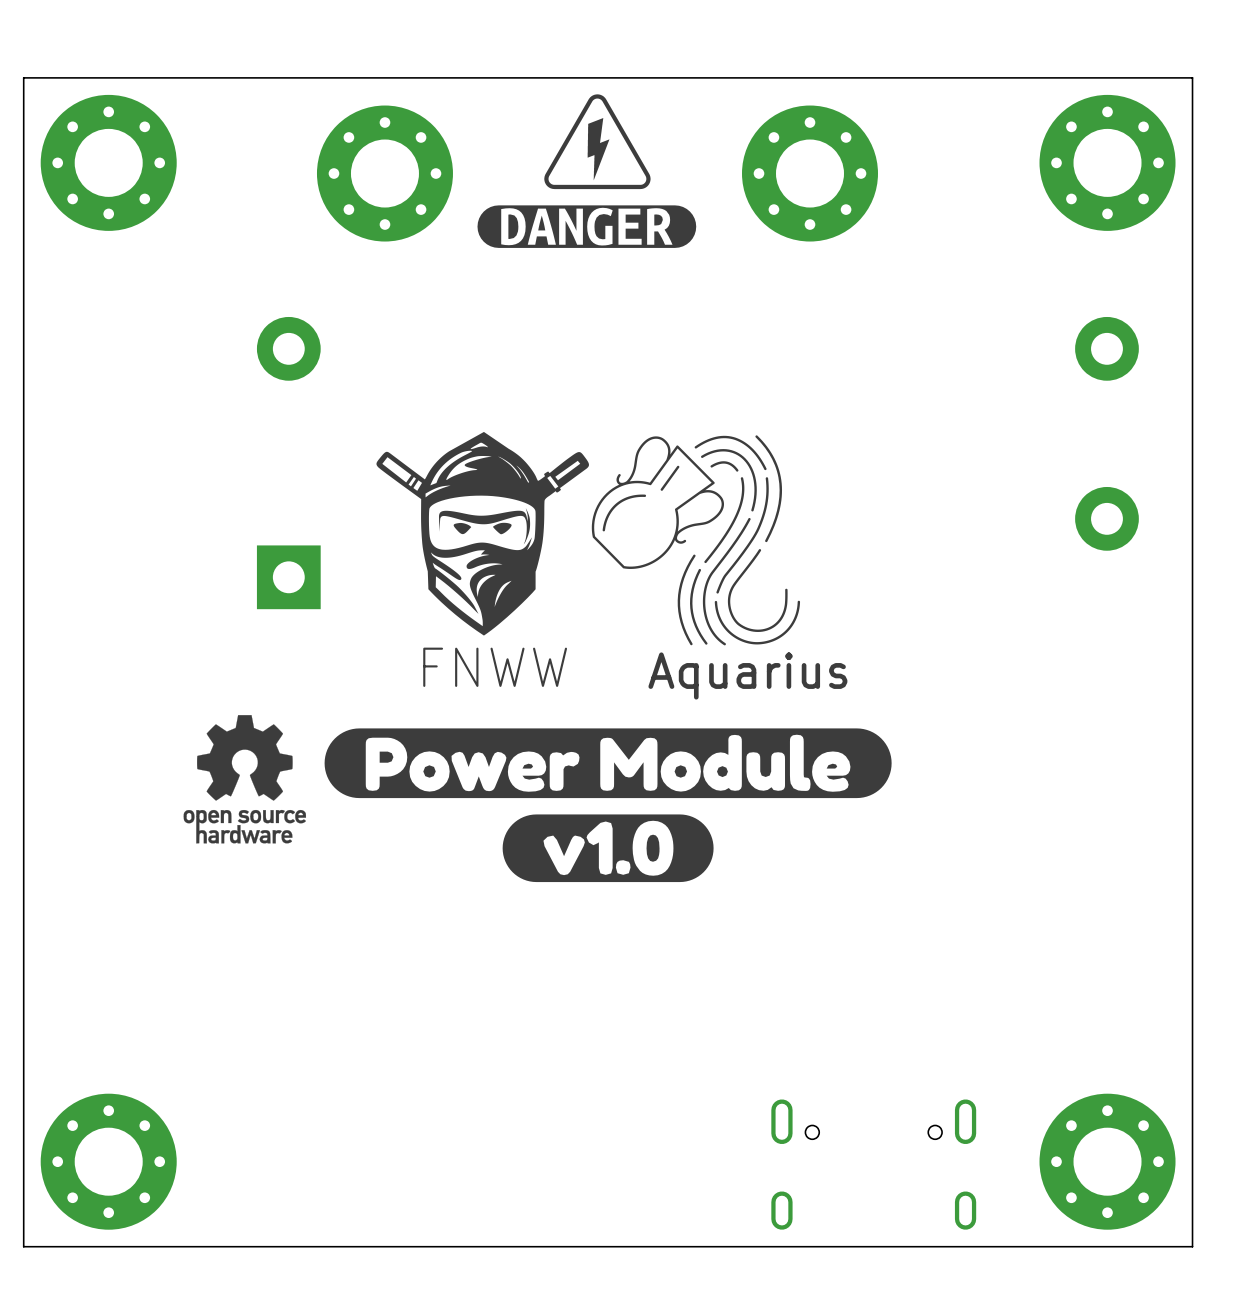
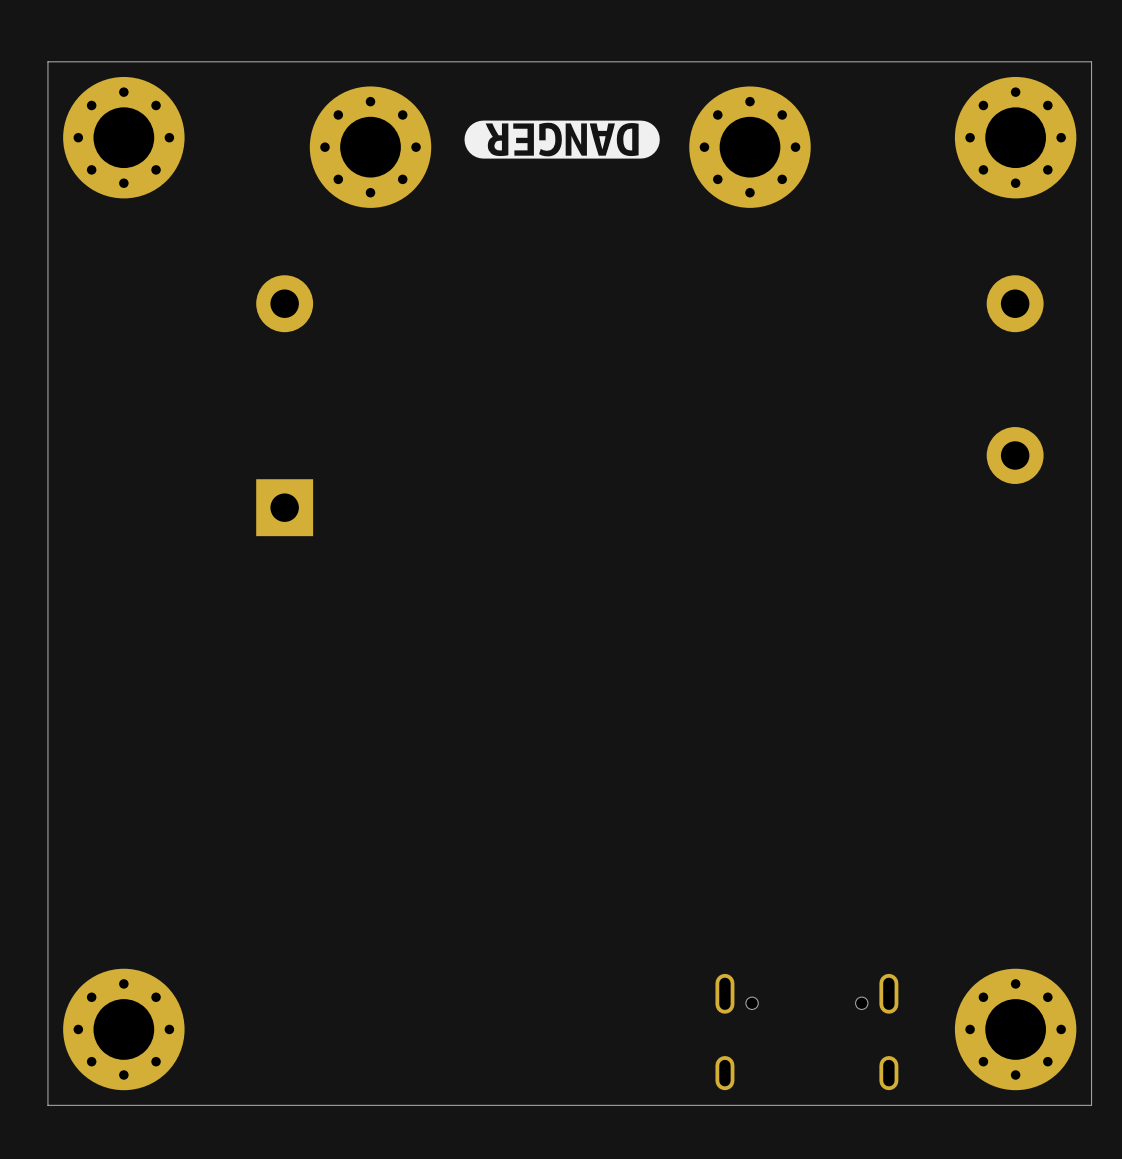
drawing: [477, 94, 697, 248] -> none
drawing: none -> [464, 120, 660, 159]
drawing: [376, 431, 801, 646] -> none
text: FNWW (495, 667) -> none
text: Aquarius (747, 675) -> none
drawing: [183, 715, 892, 883] -> none

